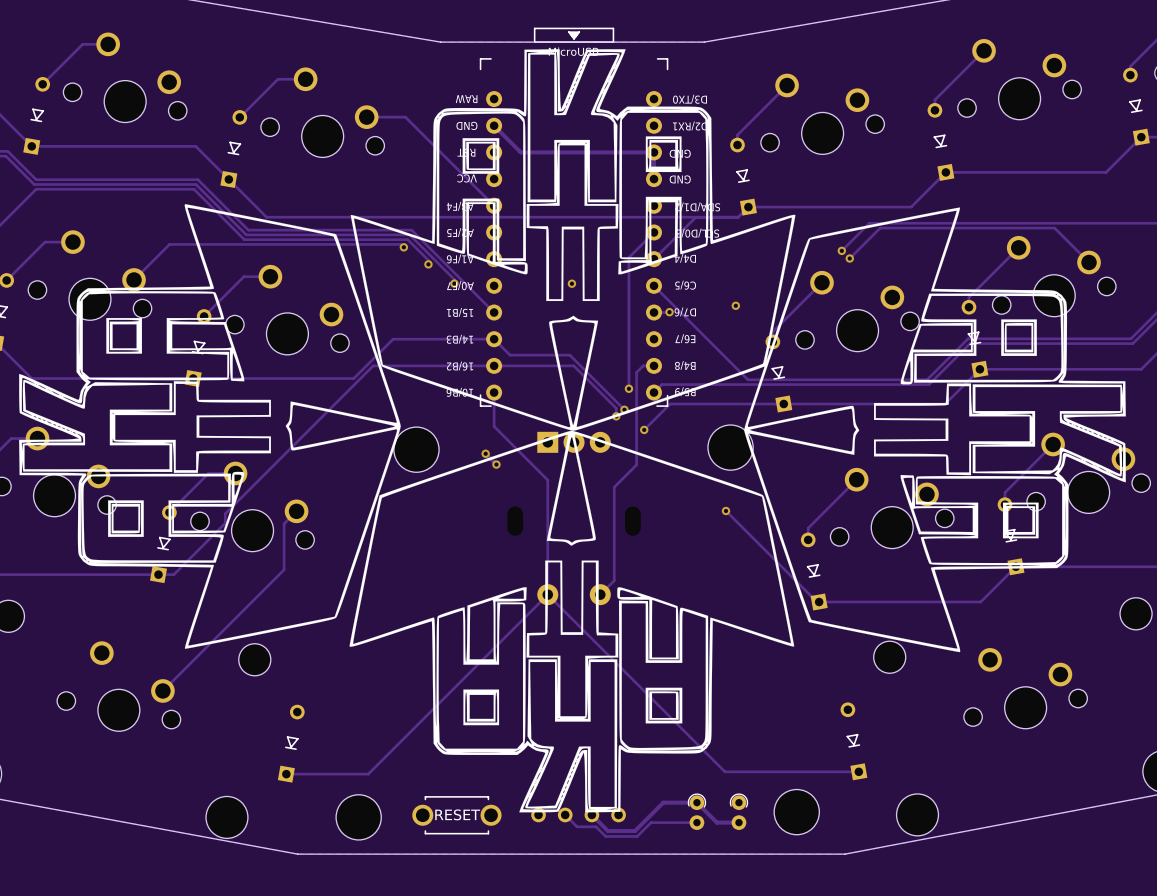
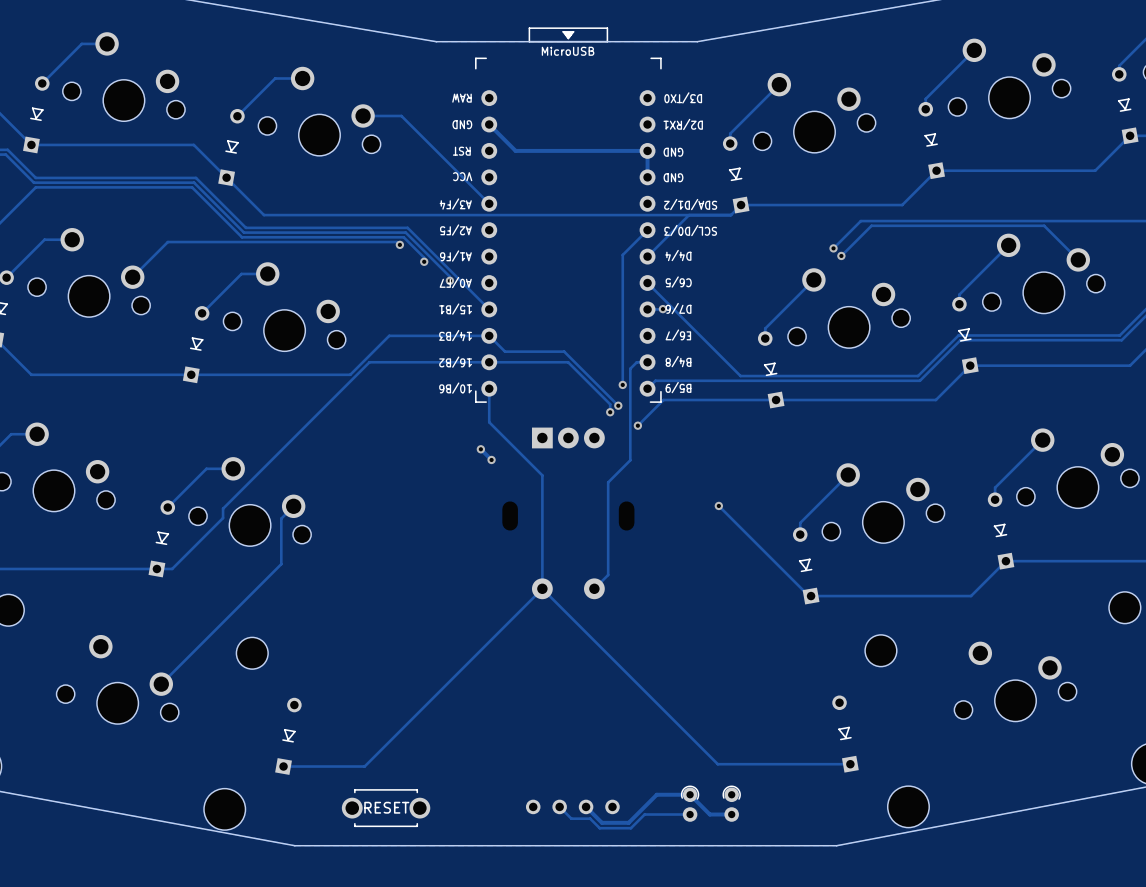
drawing: [19, 49, 1126, 813] -> none
via: (571, 283) -> none
via: (735, 305) -> none
part: (730, 447) -> none
part: (416, 449) -> none
part: (796, 812) -> none
part position: (456, 815) -> (386, 808)
part: (358, 817) -> none

